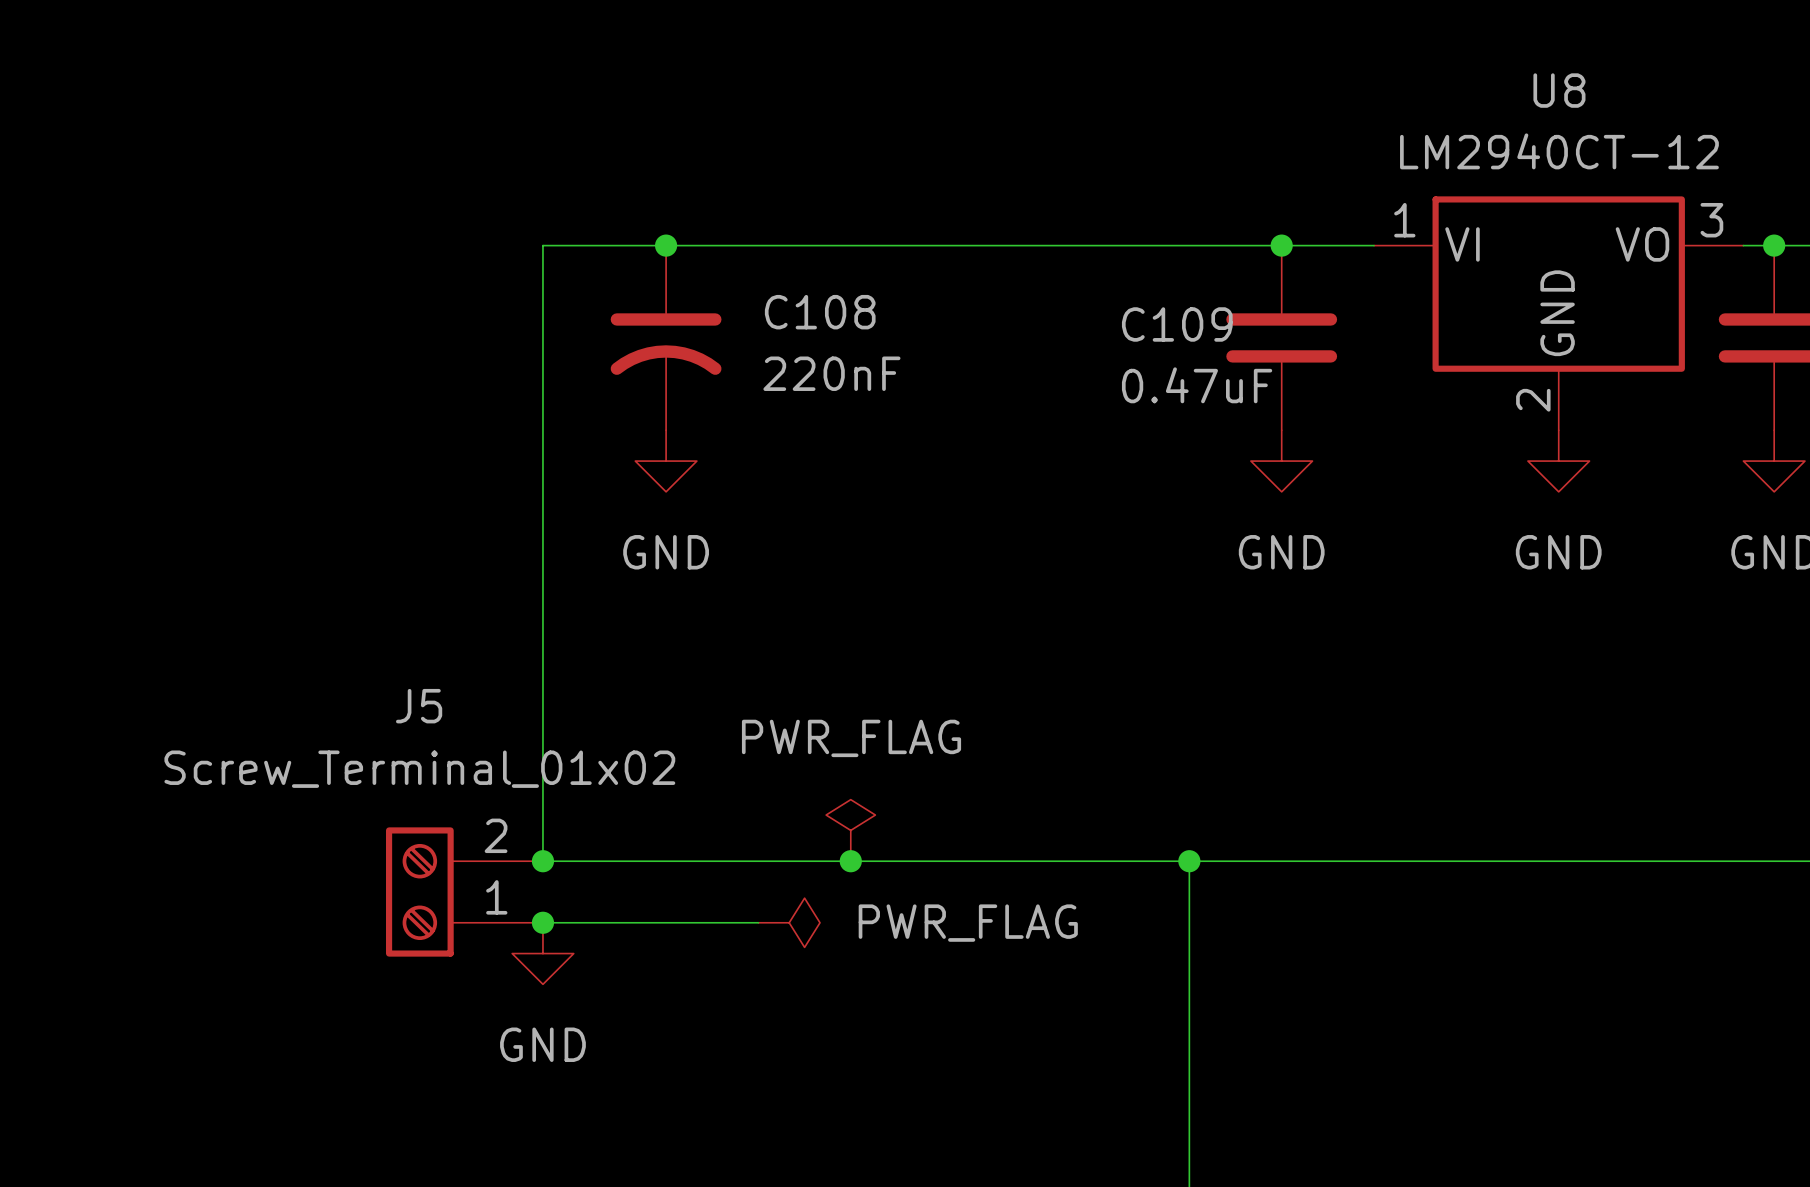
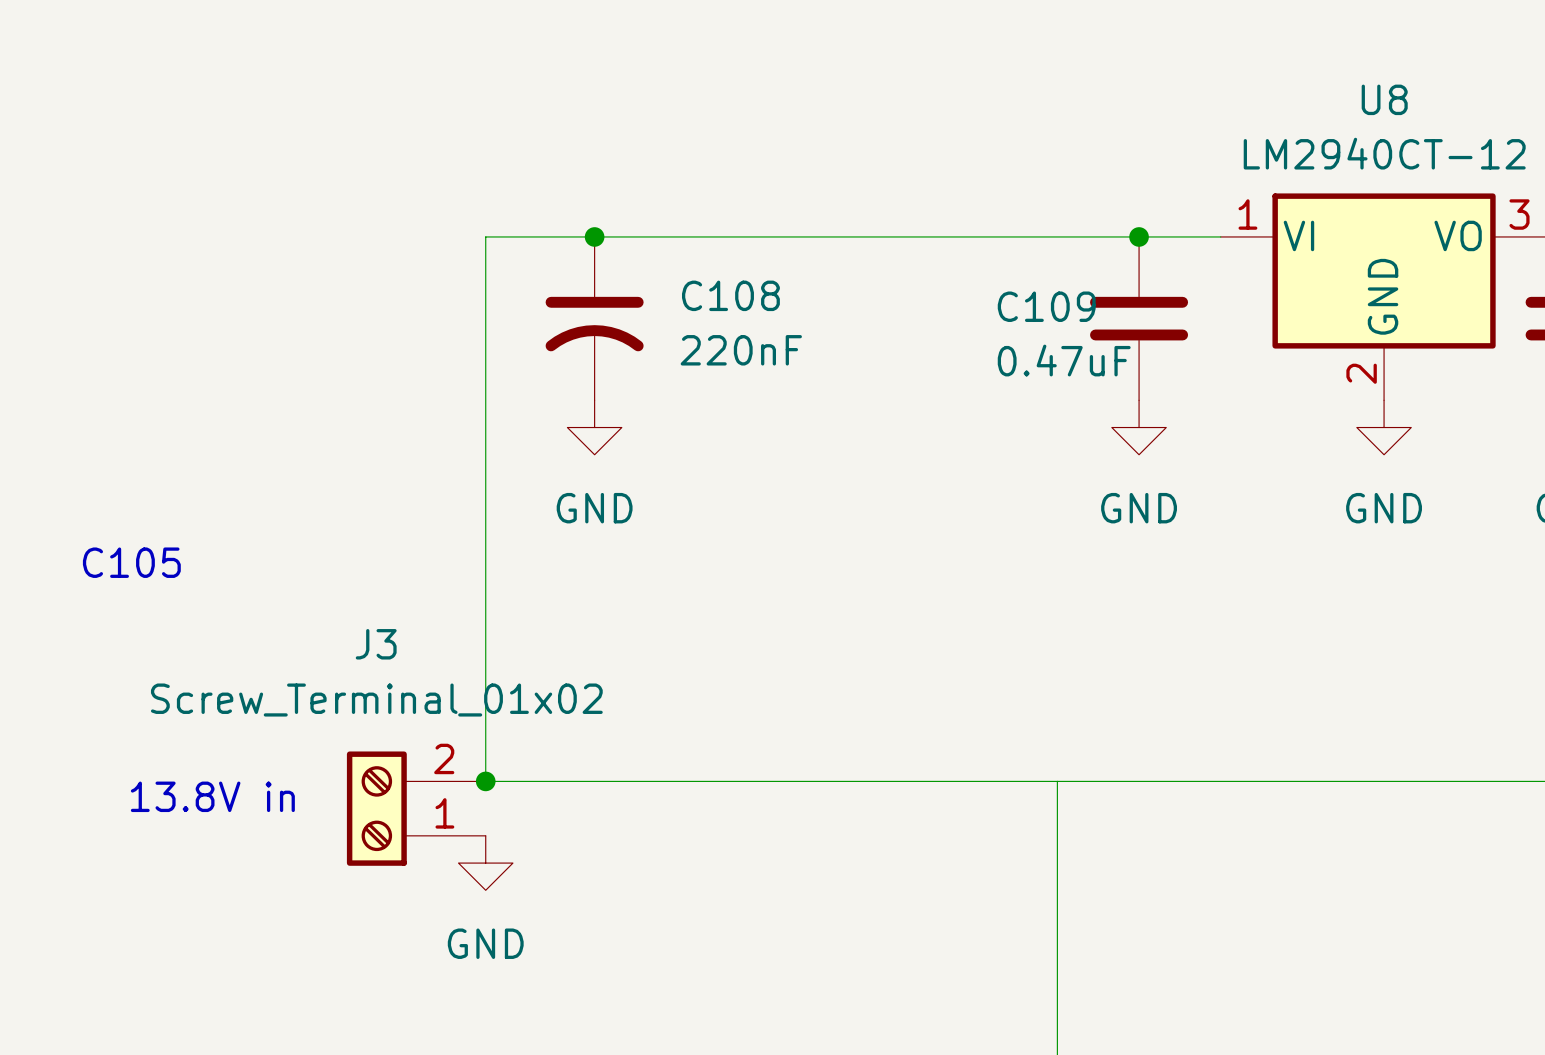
text: none -> C105 (131, 562)
J5 name: J5 (419, 706) -> J3 (376, 644)
power symbol: PWR_FLAG (850, 830) -> none
junction: (850, 861) -> none
junction: (1189, 861) -> none
text: none -> 13.8V in (212, 796)
wire: (542, 922) (758, 922) -> none
junction: (542, 922) -> none
power symbol: PWR_FLAG (789, 922) -> none

